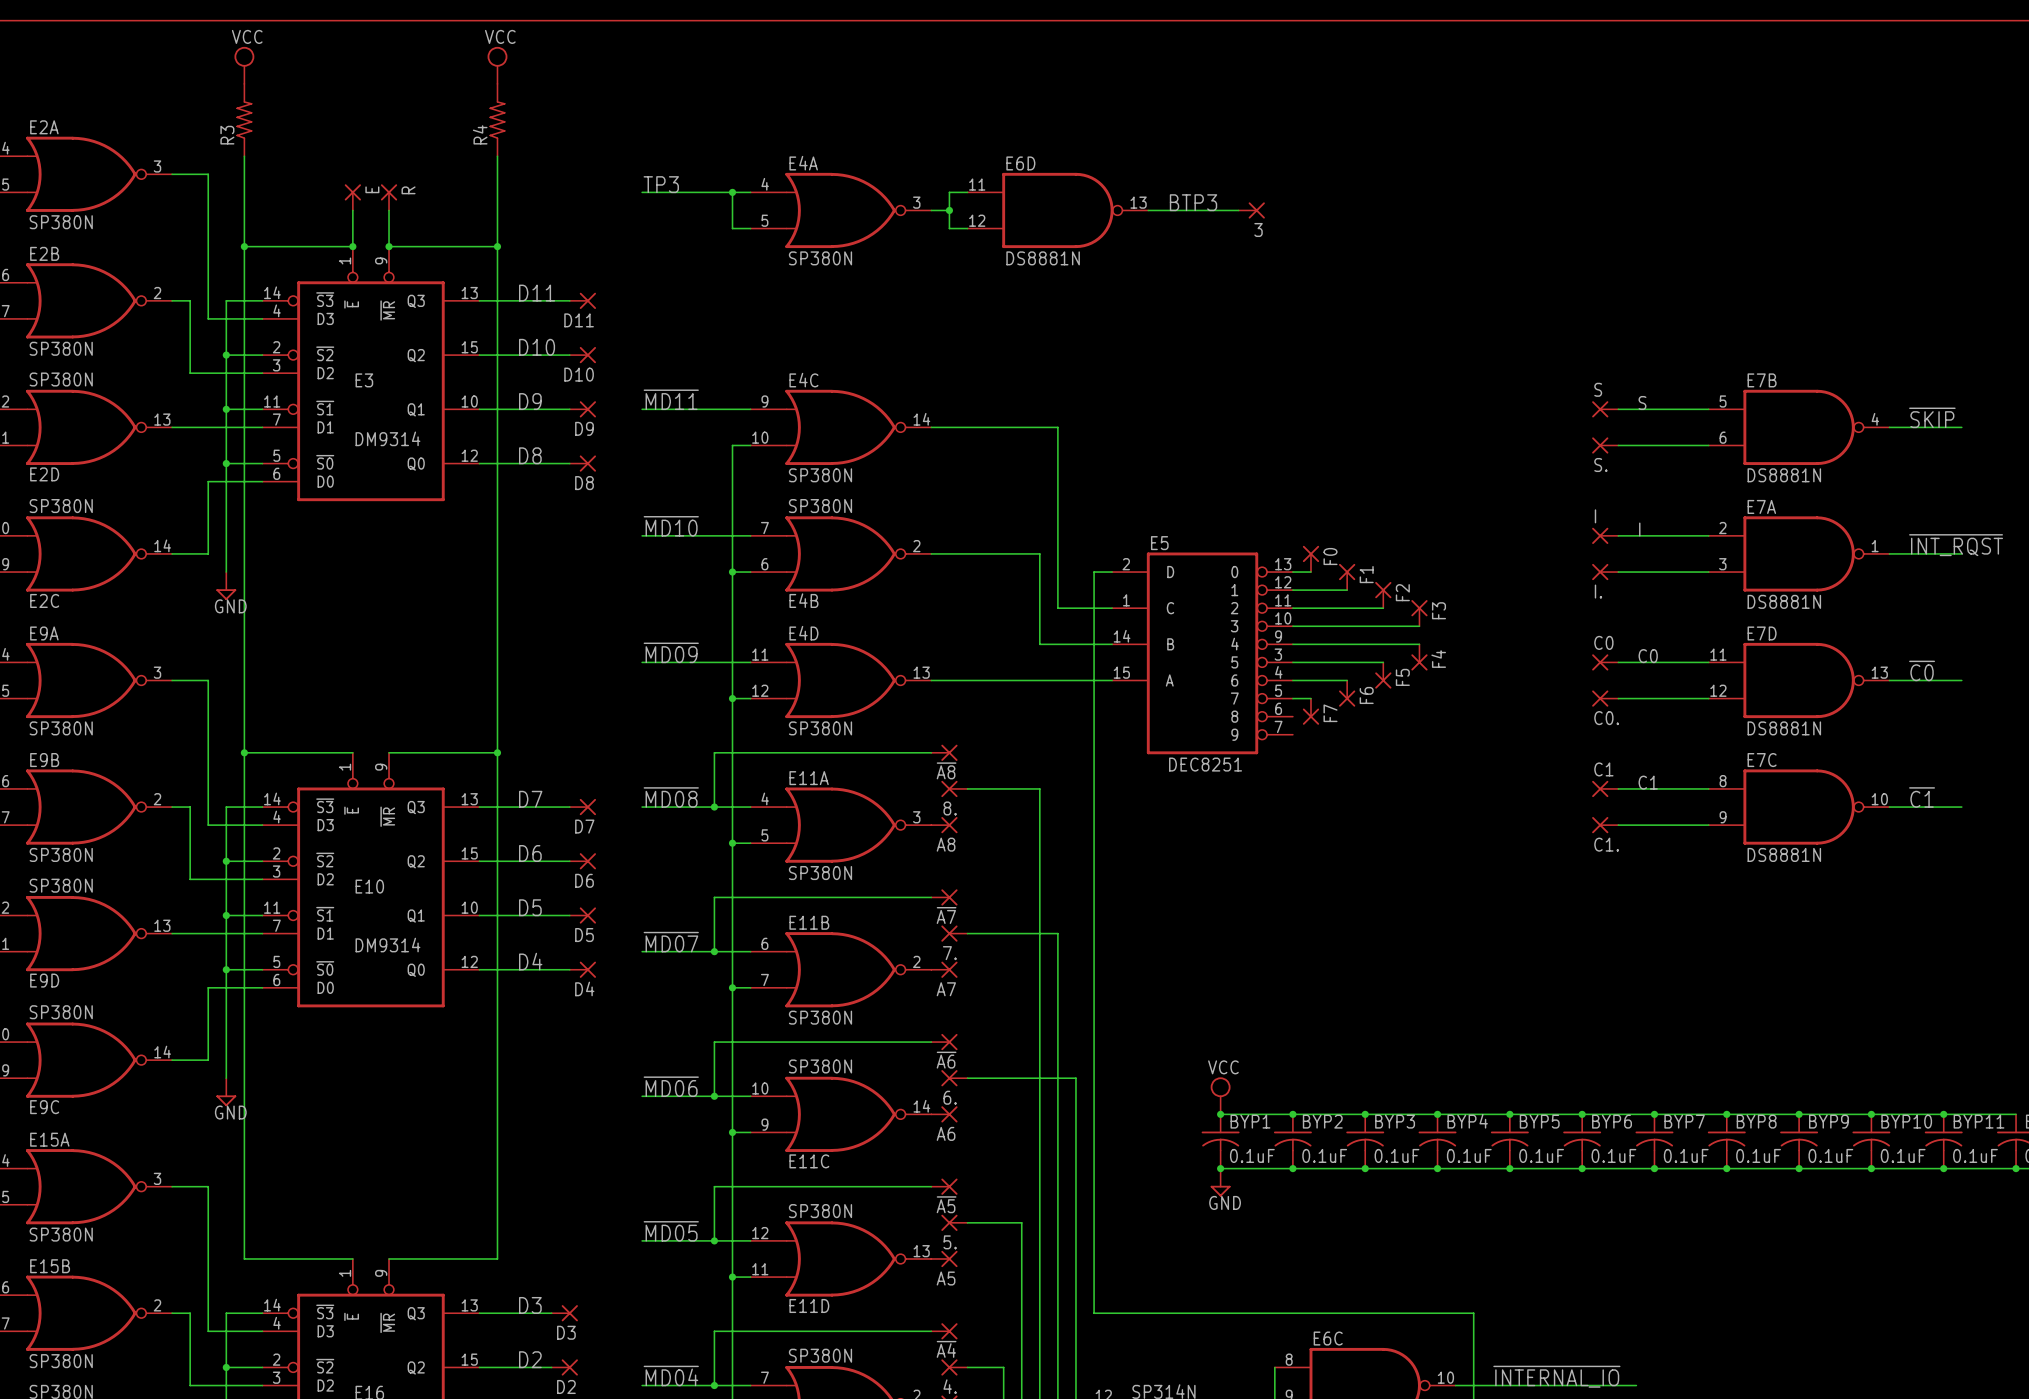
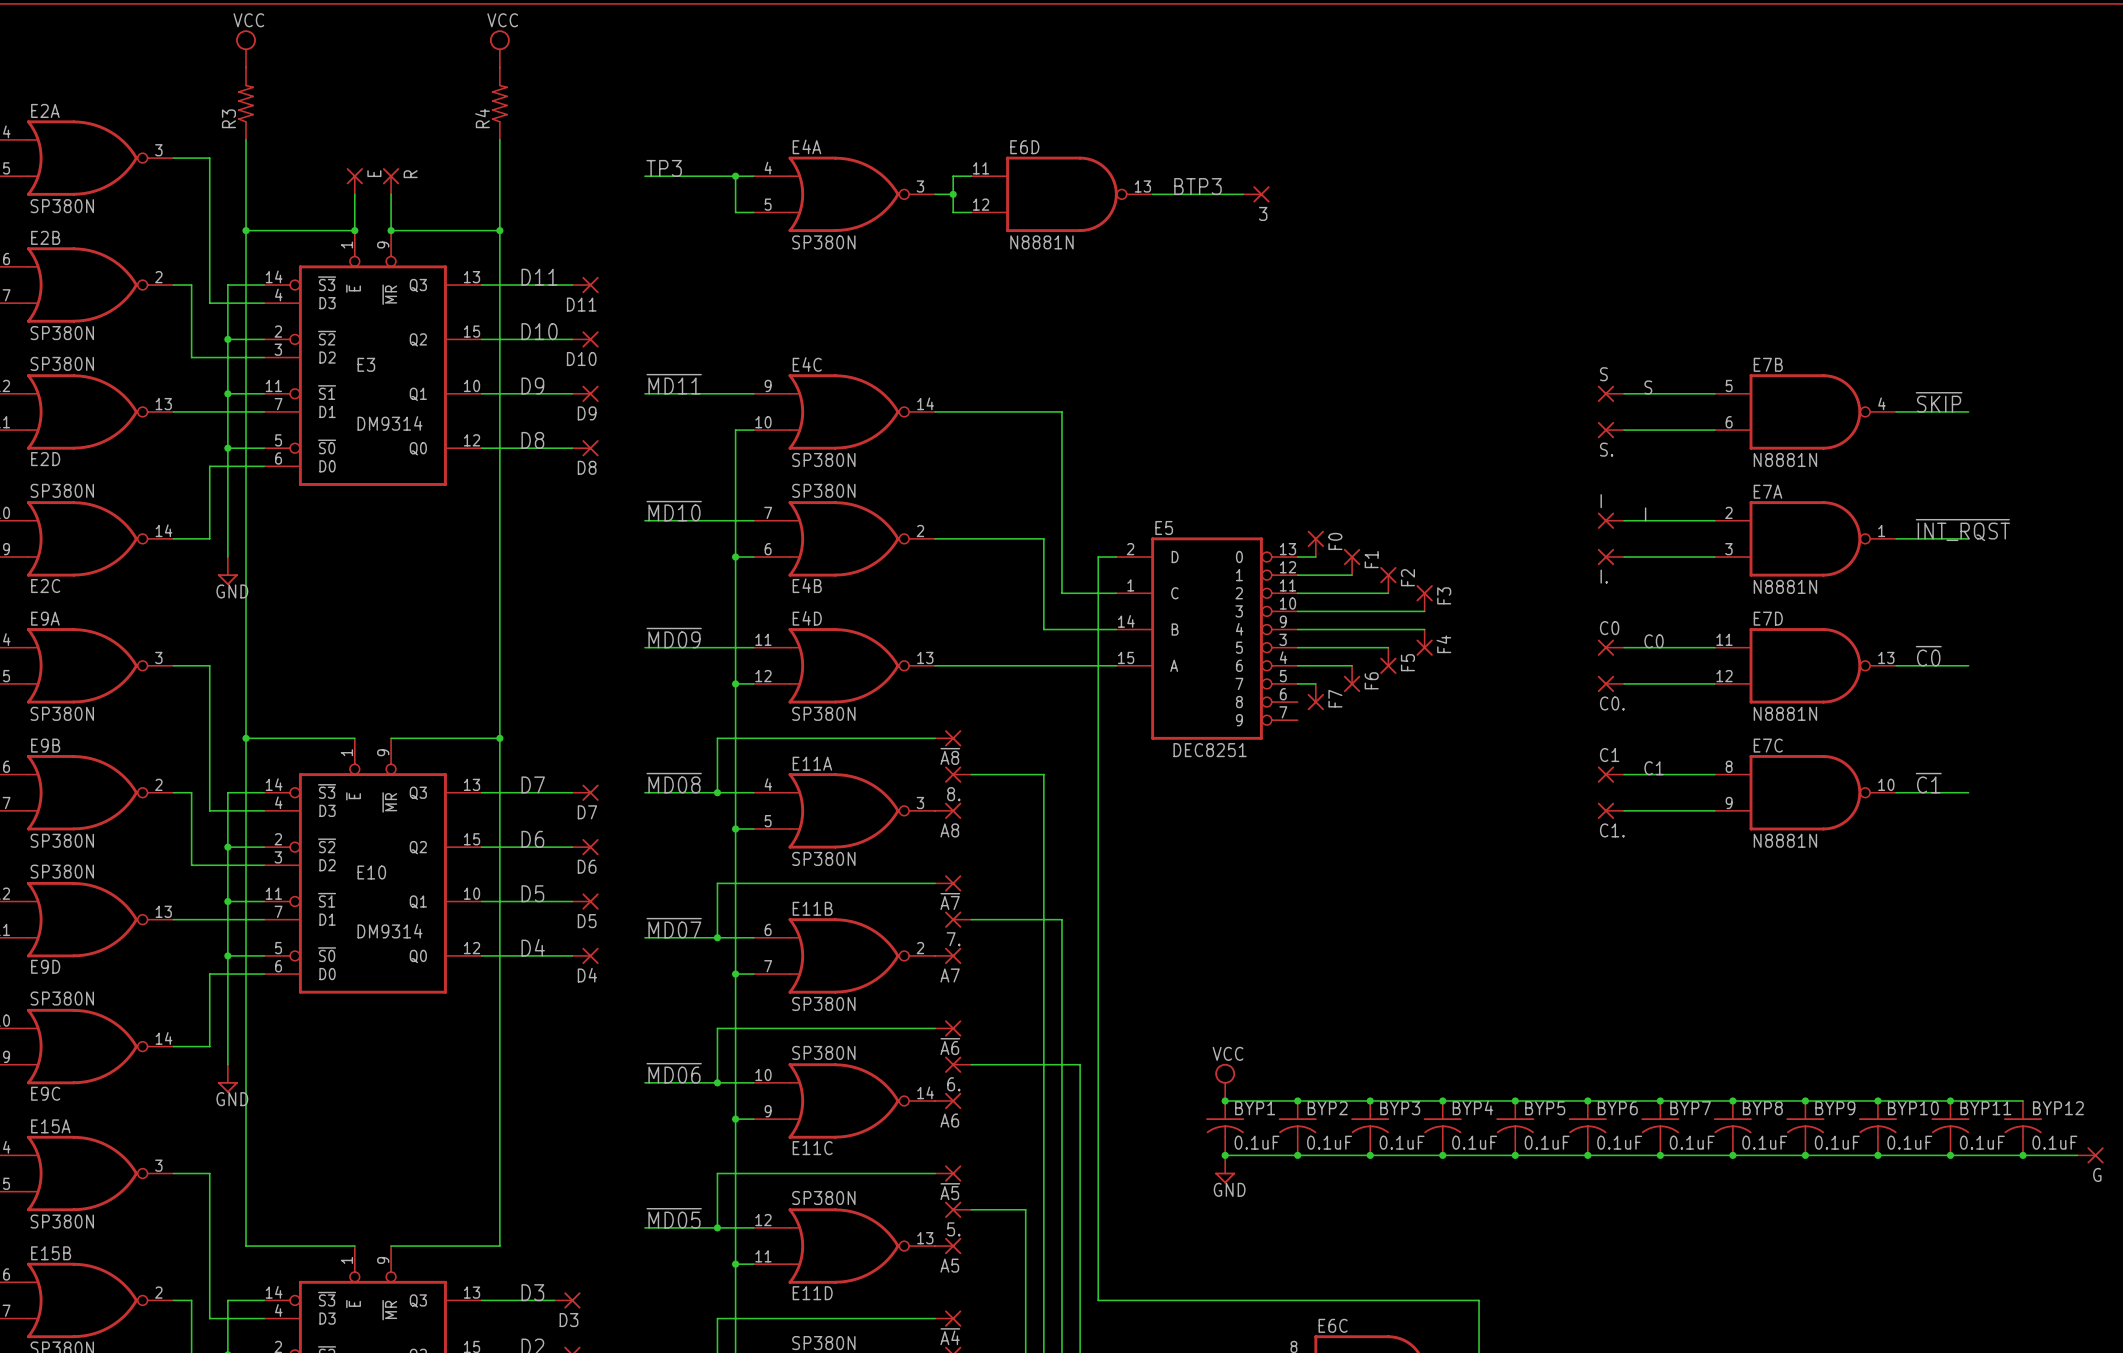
E6D value: DS8881N (1043, 258) -> N8881N (1041, 242)
E7B value: DS8881N (1784, 475) -> N8881N (1785, 459)
E7A value: DS8881N (1784, 601) -> N8881N (1785, 586)
E7D value: DS8881N (1784, 728) -> N8881N (1785, 713)
E7C value: DS8881N (1784, 854) -> N8881N (1785, 840)

